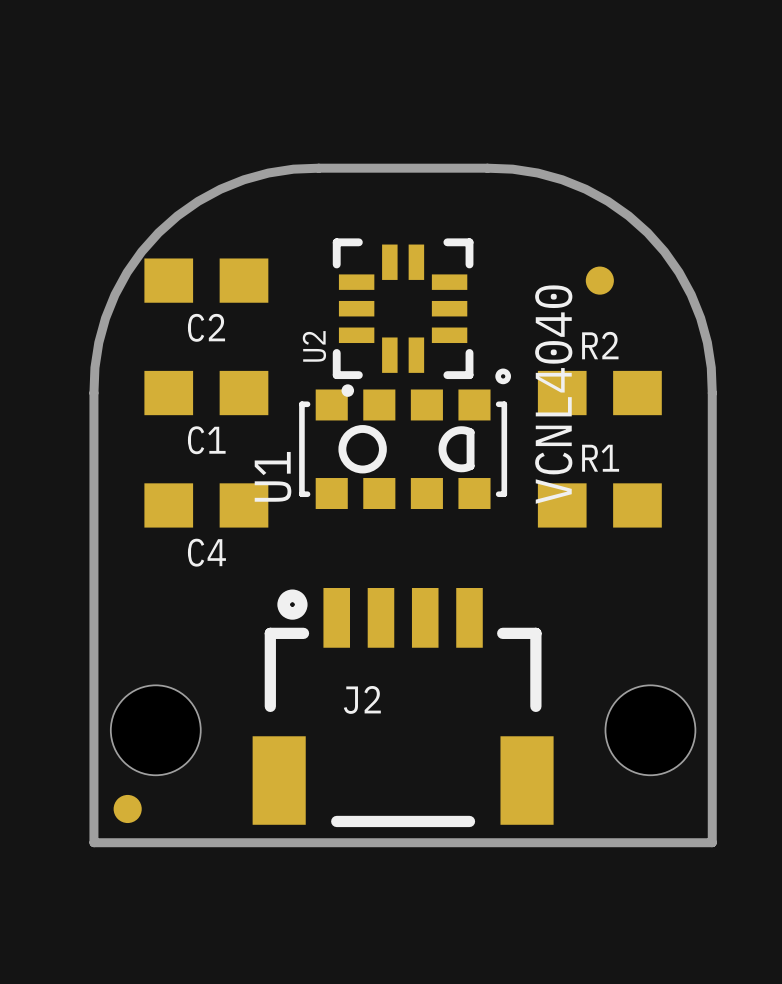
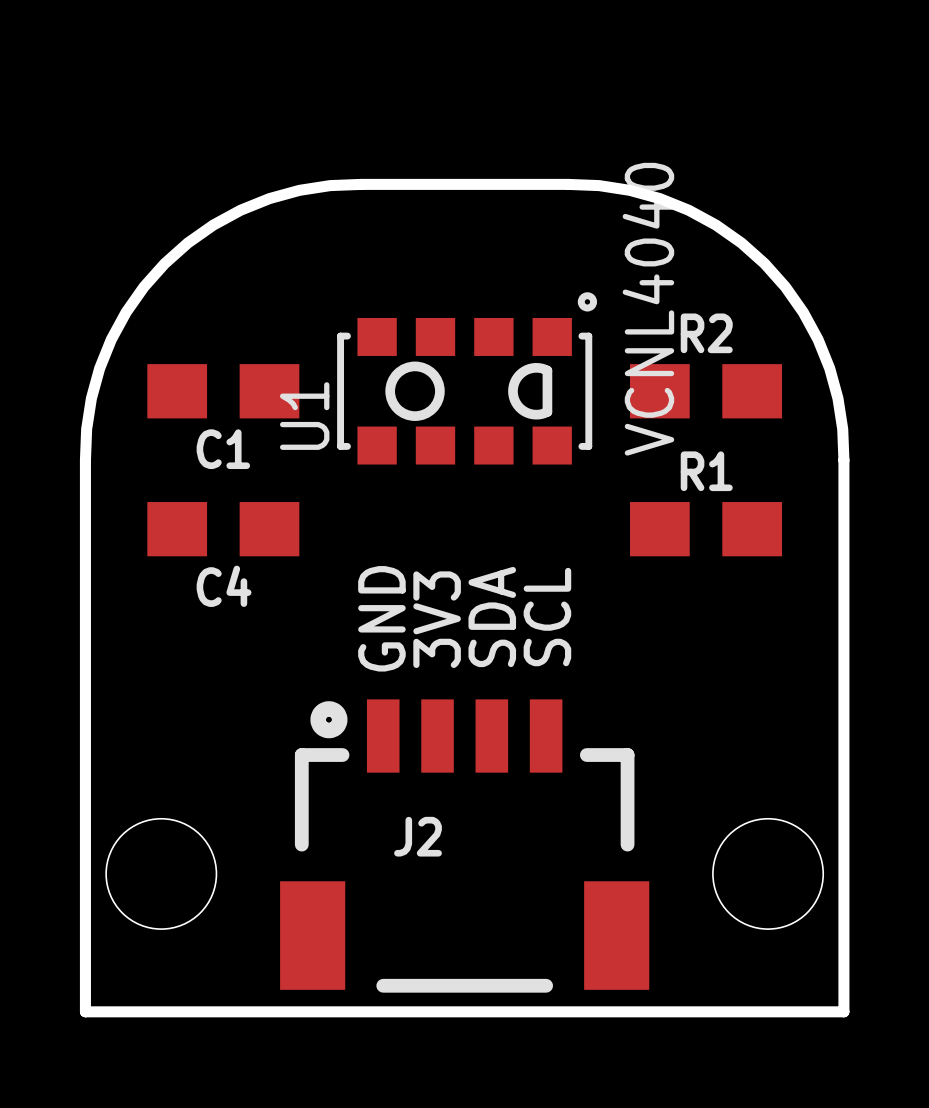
C2: (206, 280) -> none
part: (599, 280) -> none
U2: (403, 317) -> none
C1 position: (206, 393) -> (223, 391)
R2 position: (599, 393) -> (706, 391)
U1 position: (405, 438) -> (467, 378)
C4 position: (206, 505) -> (223, 529)
R1 position: (599, 505) -> (706, 529)
text: none -> SDA (492, 617)
text: none -> GND (381, 618)
text: none -> SCL (547, 617)
text: none -> 3V3 (437, 619)
part: (127, 808) -> none

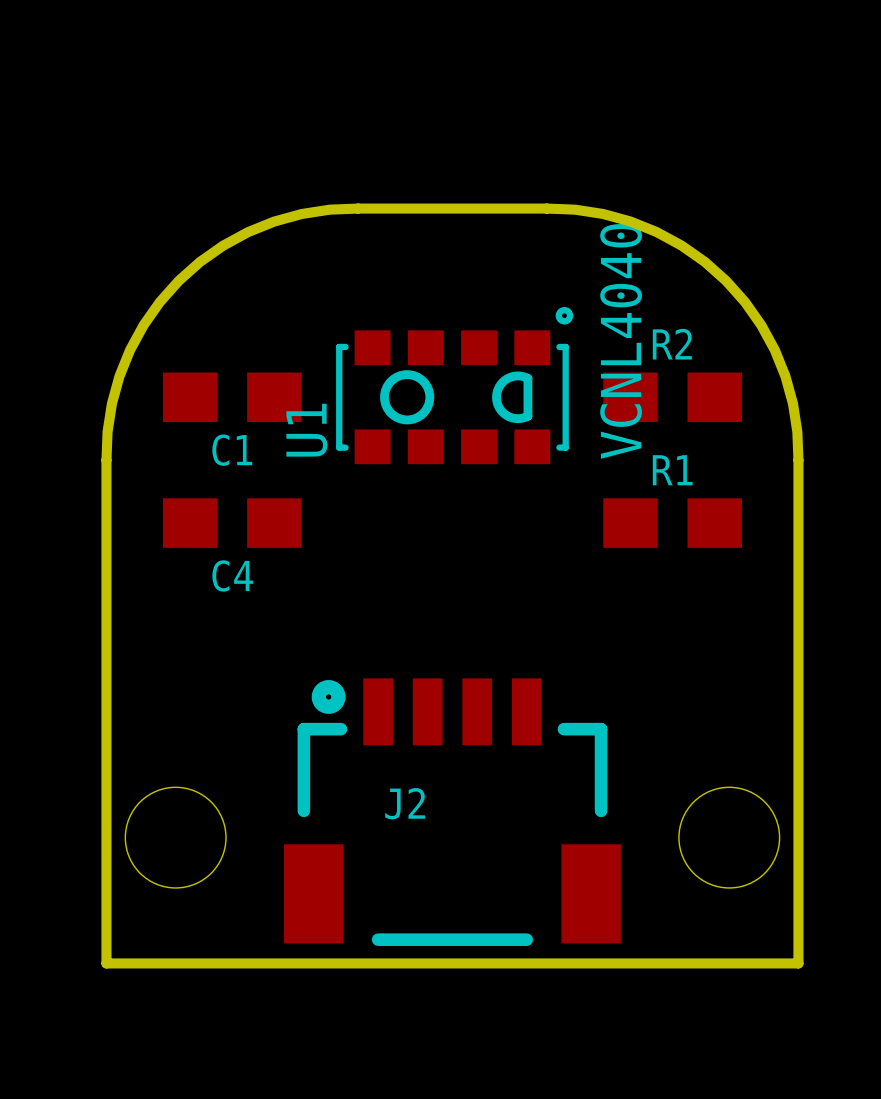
text: SDA (492, 617) -> none
text: SCL (547, 617) -> none
text: GND (381, 618) -> none
text: 3V3 (437, 619) -> none

